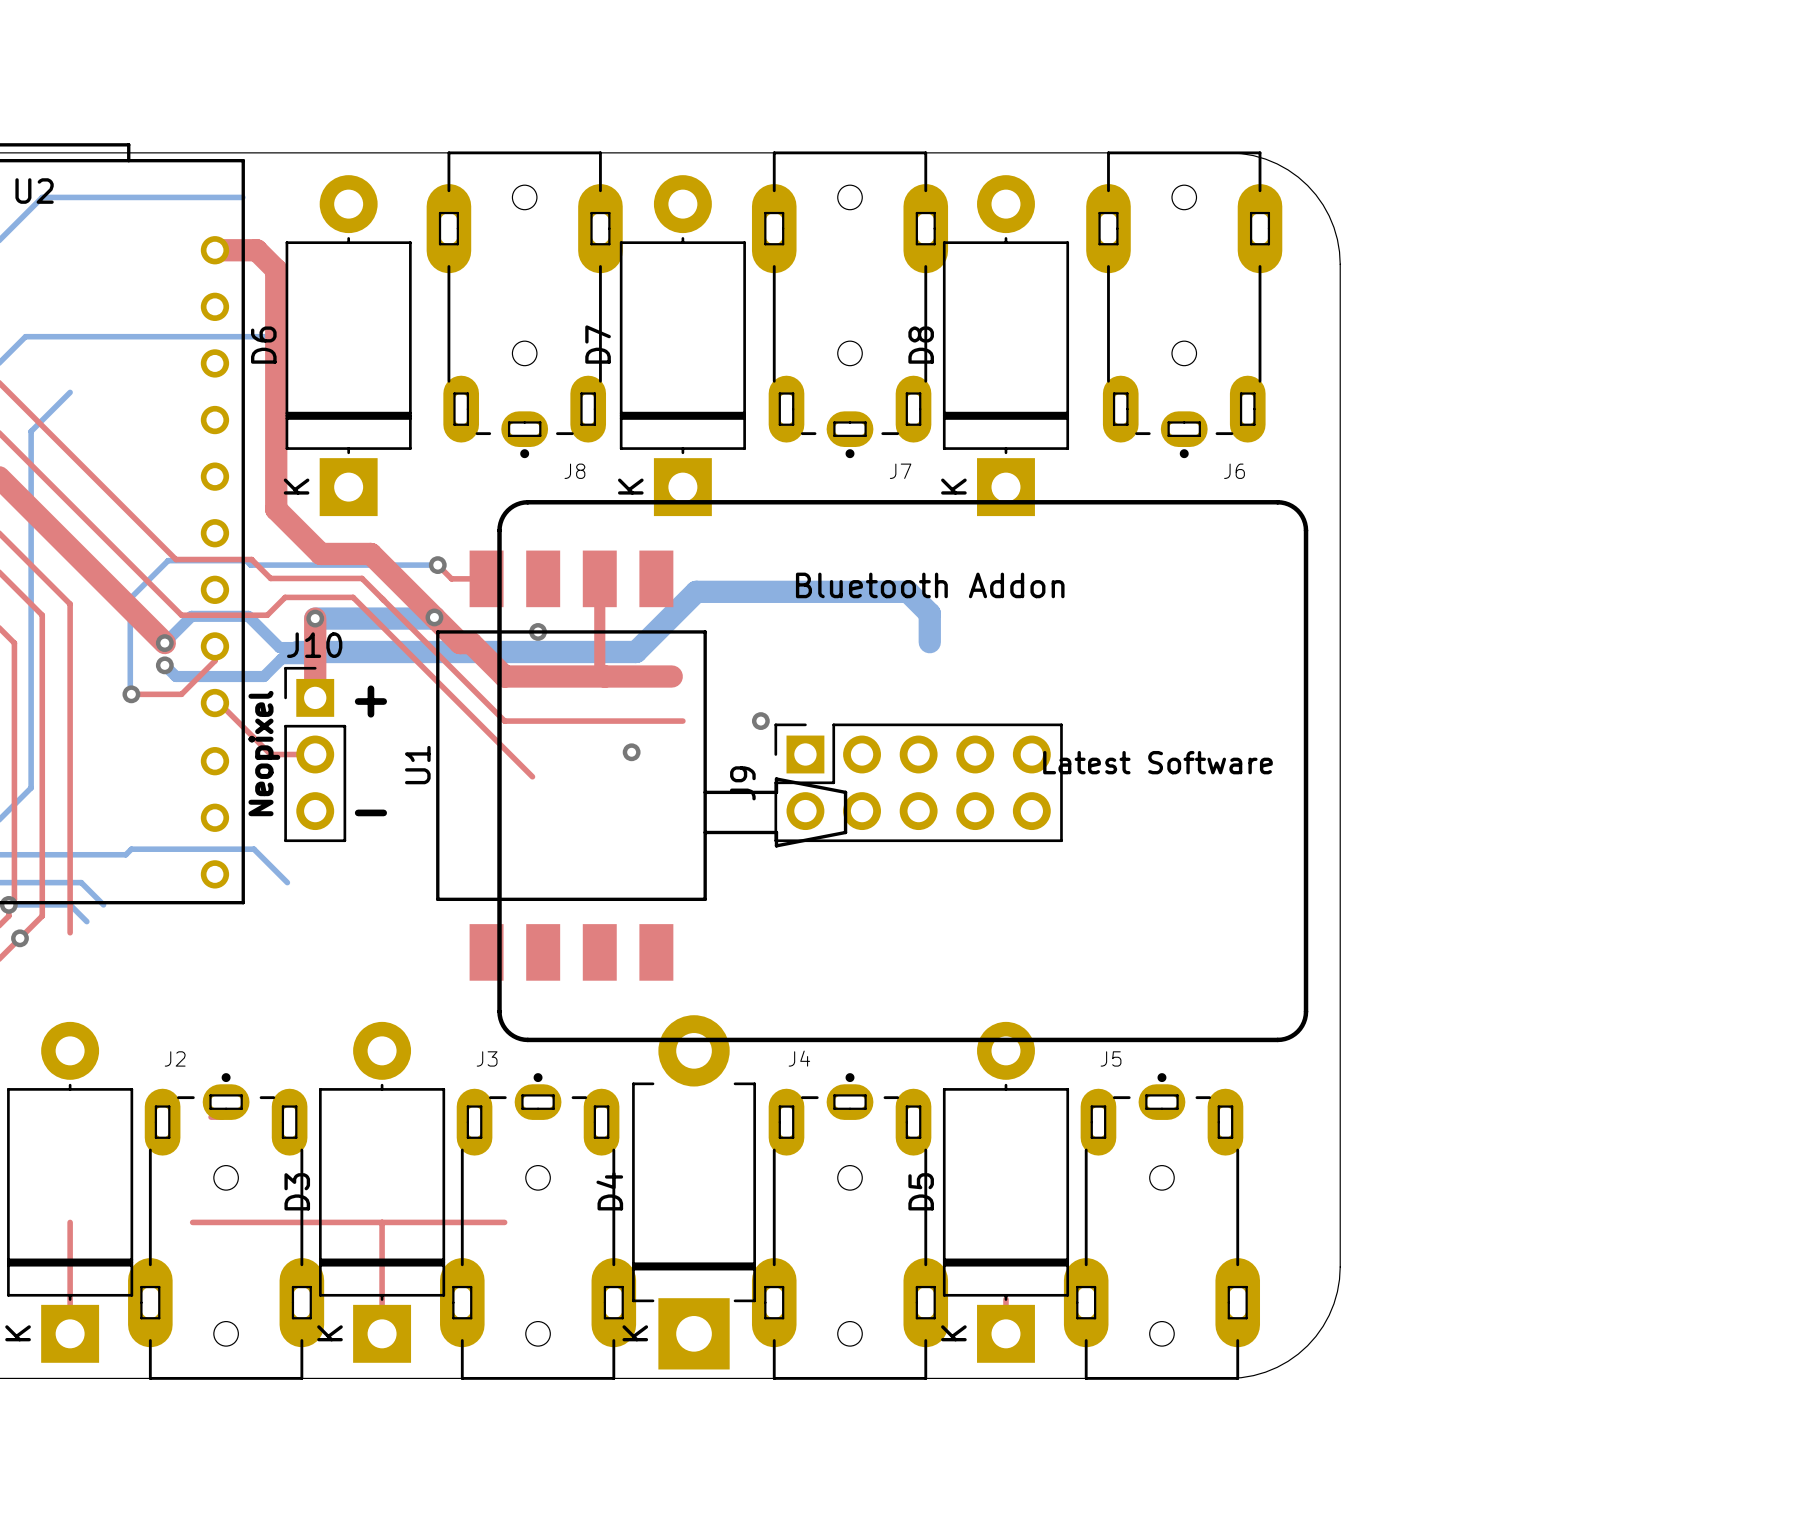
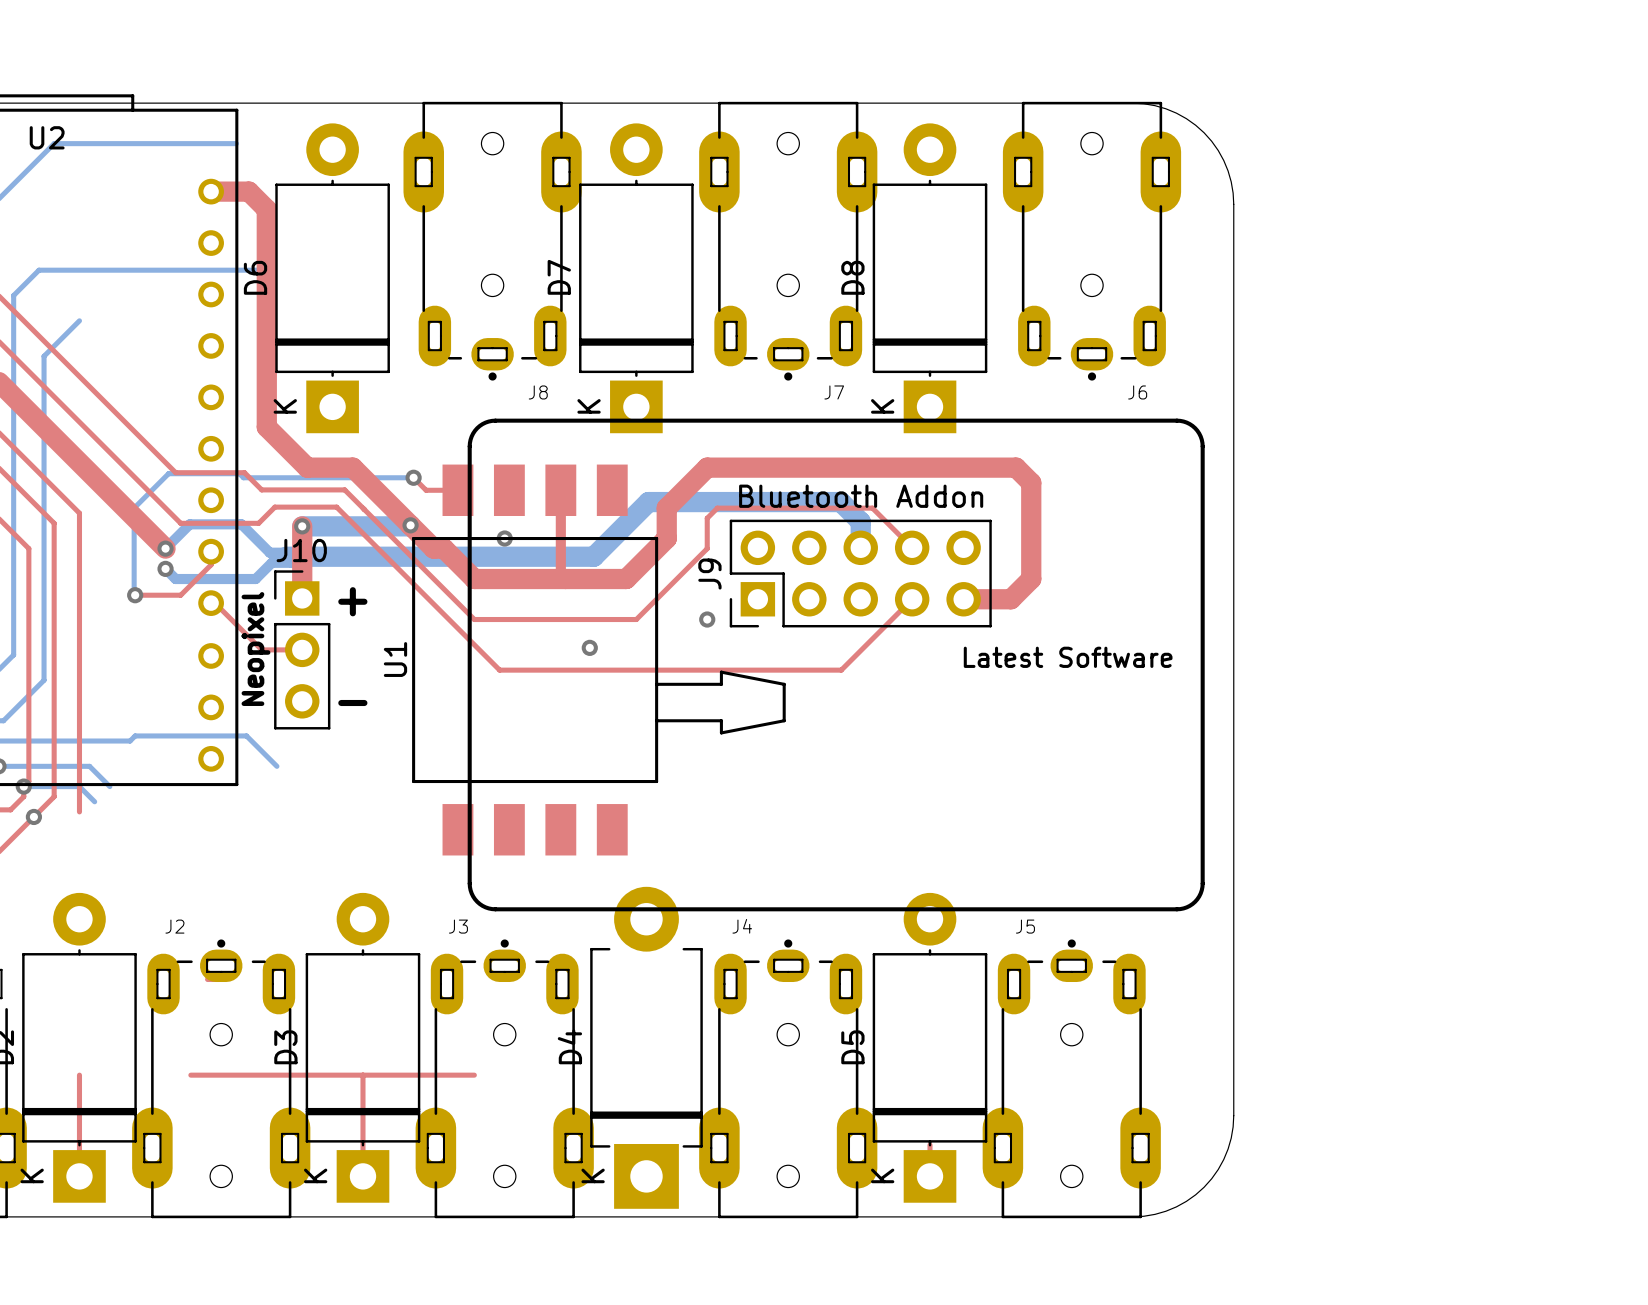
top track: none -> (912, 547) (872, 508) (717, 508) (707, 518) (707, 548) (636, 619)
top track: none -> (626, 579) (666, 538) (666, 508) (707, 467) (1016, 467) (1031, 482) (1031, 579) (1011, 599) (963, 599)
top track: none -> (912, 599) (841, 670) (499, 670)
J9 footprint: [774, 723, 1063, 843] -> [729, 519, 992, 628]

